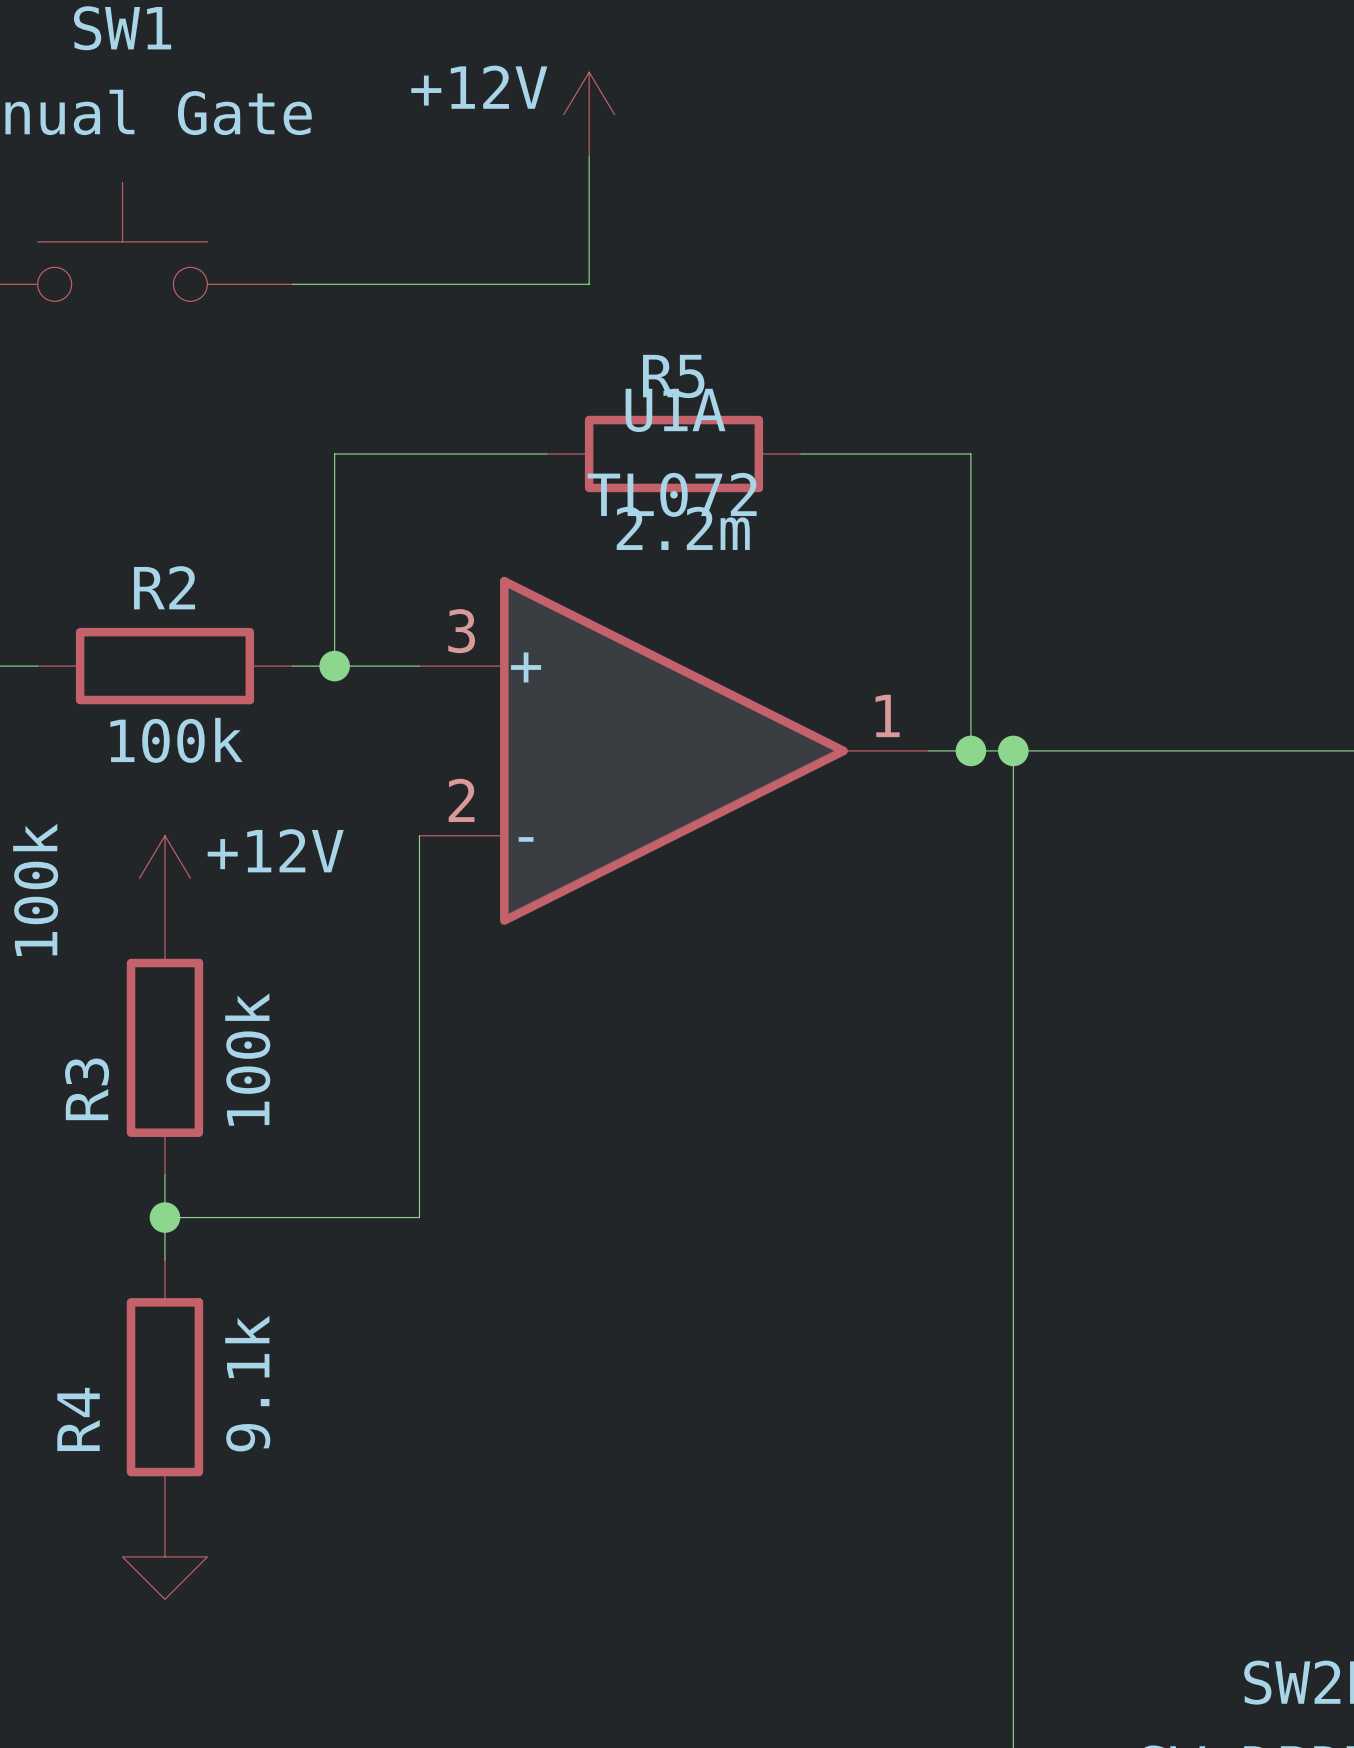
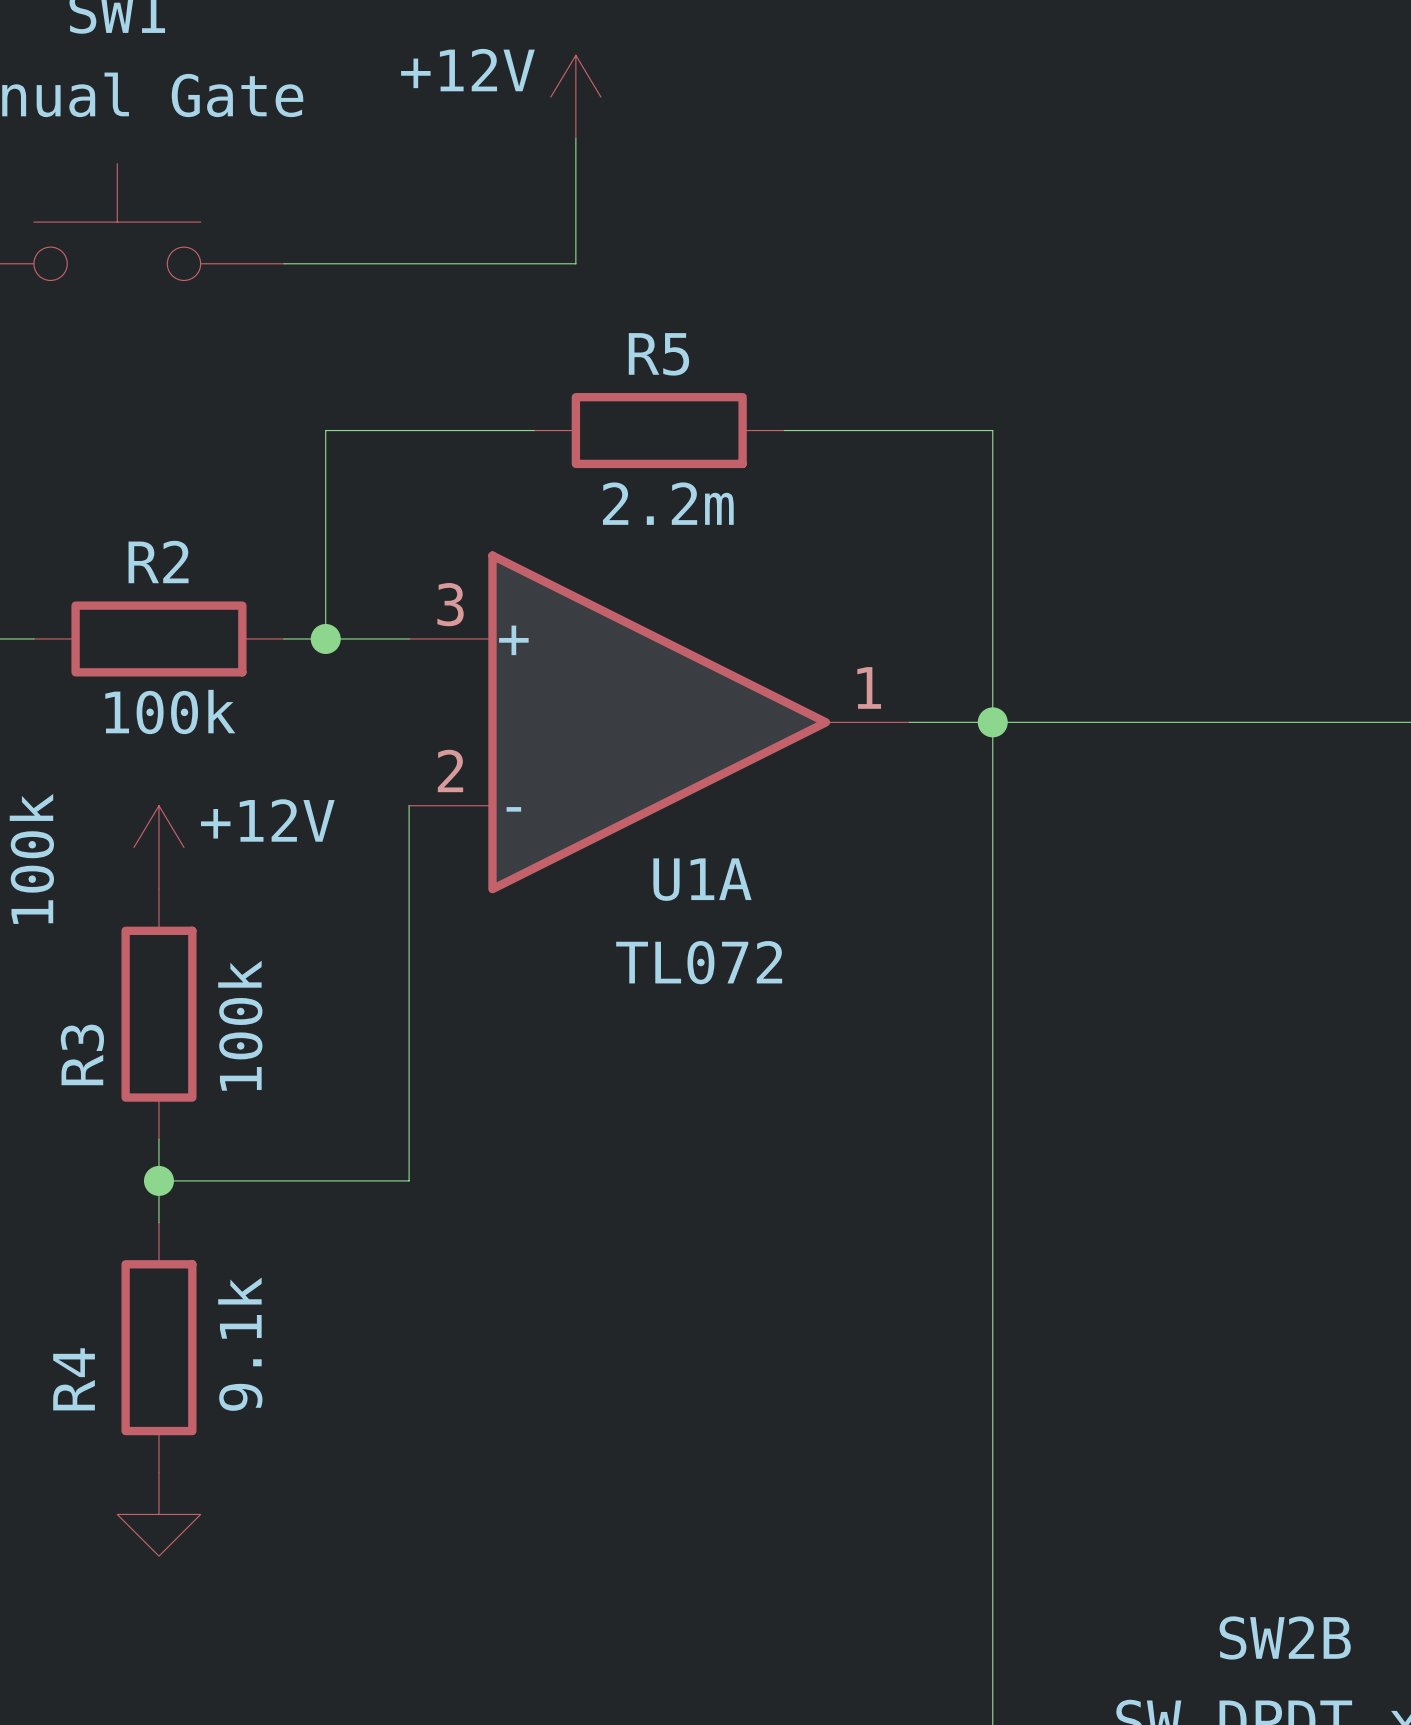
U1A name position: U1A (675, 410) -> U1A (702, 879)
wire: (970, 453) (970, 750) -> (951, 430) (992, 430) (992, 722)
U1A value position: TL072 (672, 494) -> TL072 (699, 962)
junction: (970, 750) -> none

